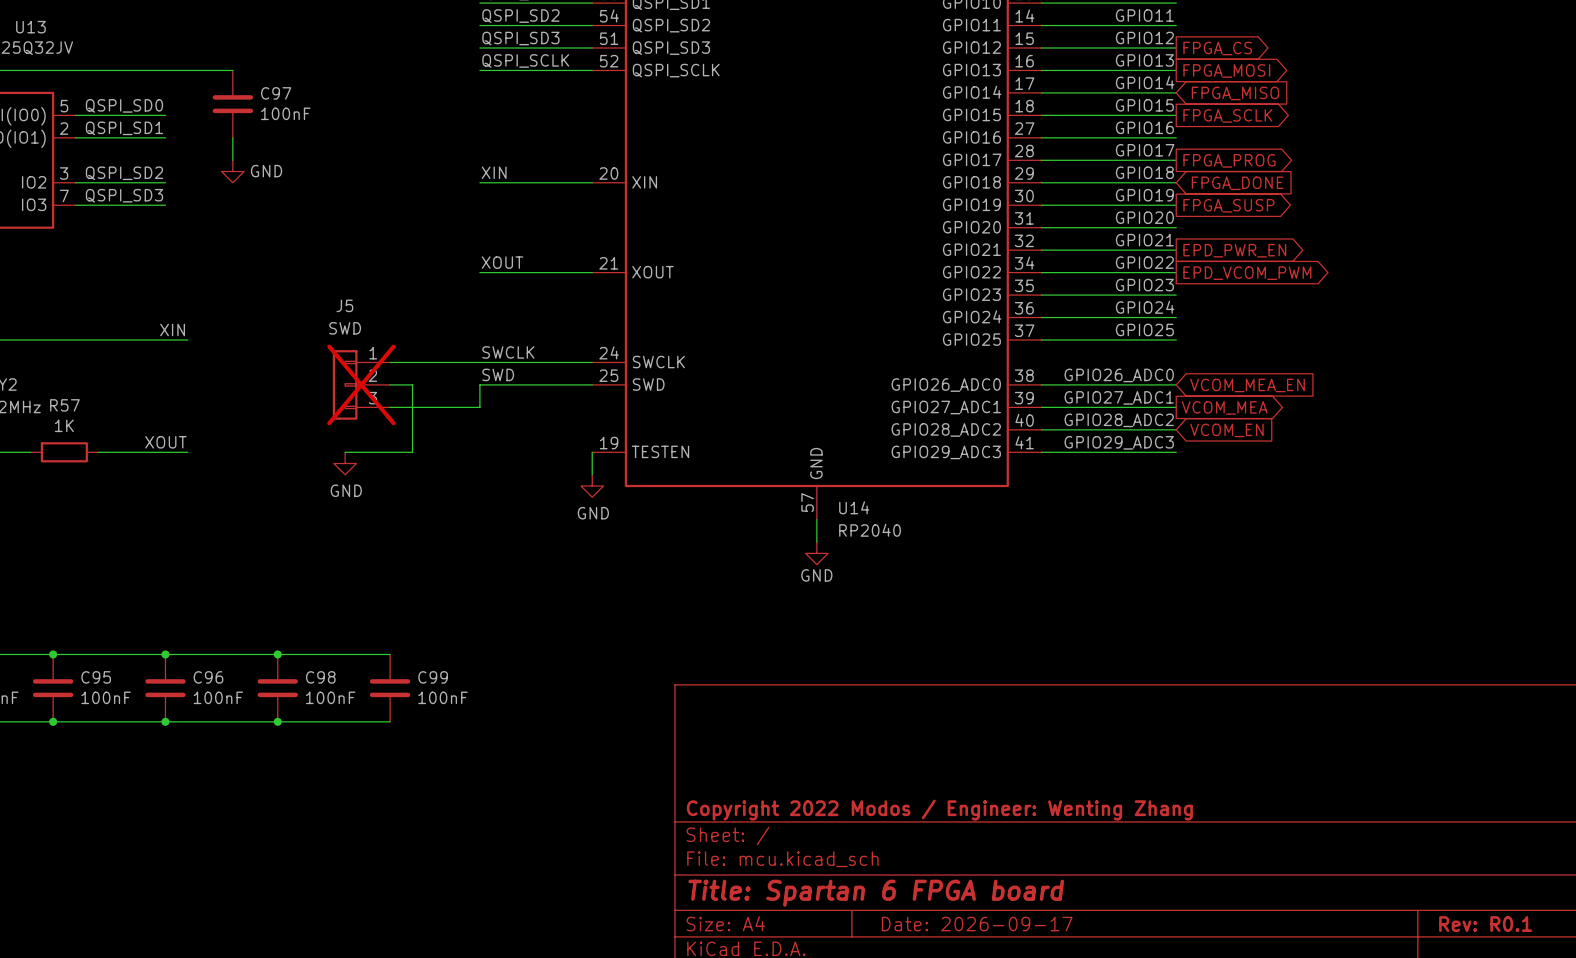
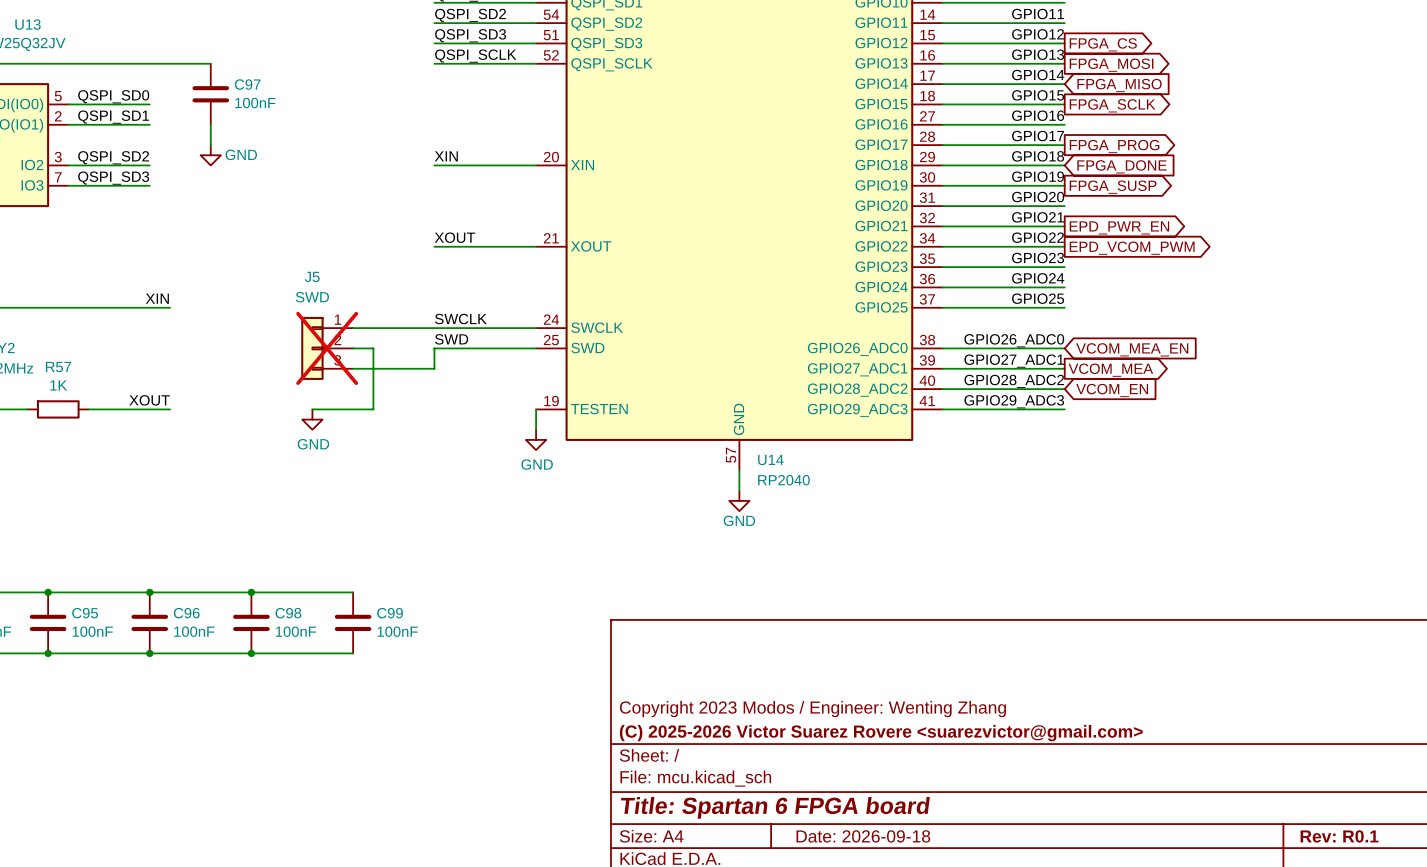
title block: none -> Copyright 2023 Modos / Engineer: Wenting Zhang (812, 709)
title block: Copyright 2022 Modos / Engineer: Wenting Zhang (939, 810) -> (C) 2025-2026 Victor Suarez Rovere <suarezvictor@gmail.com> (881, 733)
title block: Date: 2026-09-17 (977, 924) -> Date: 2026-09-18 (863, 836)

